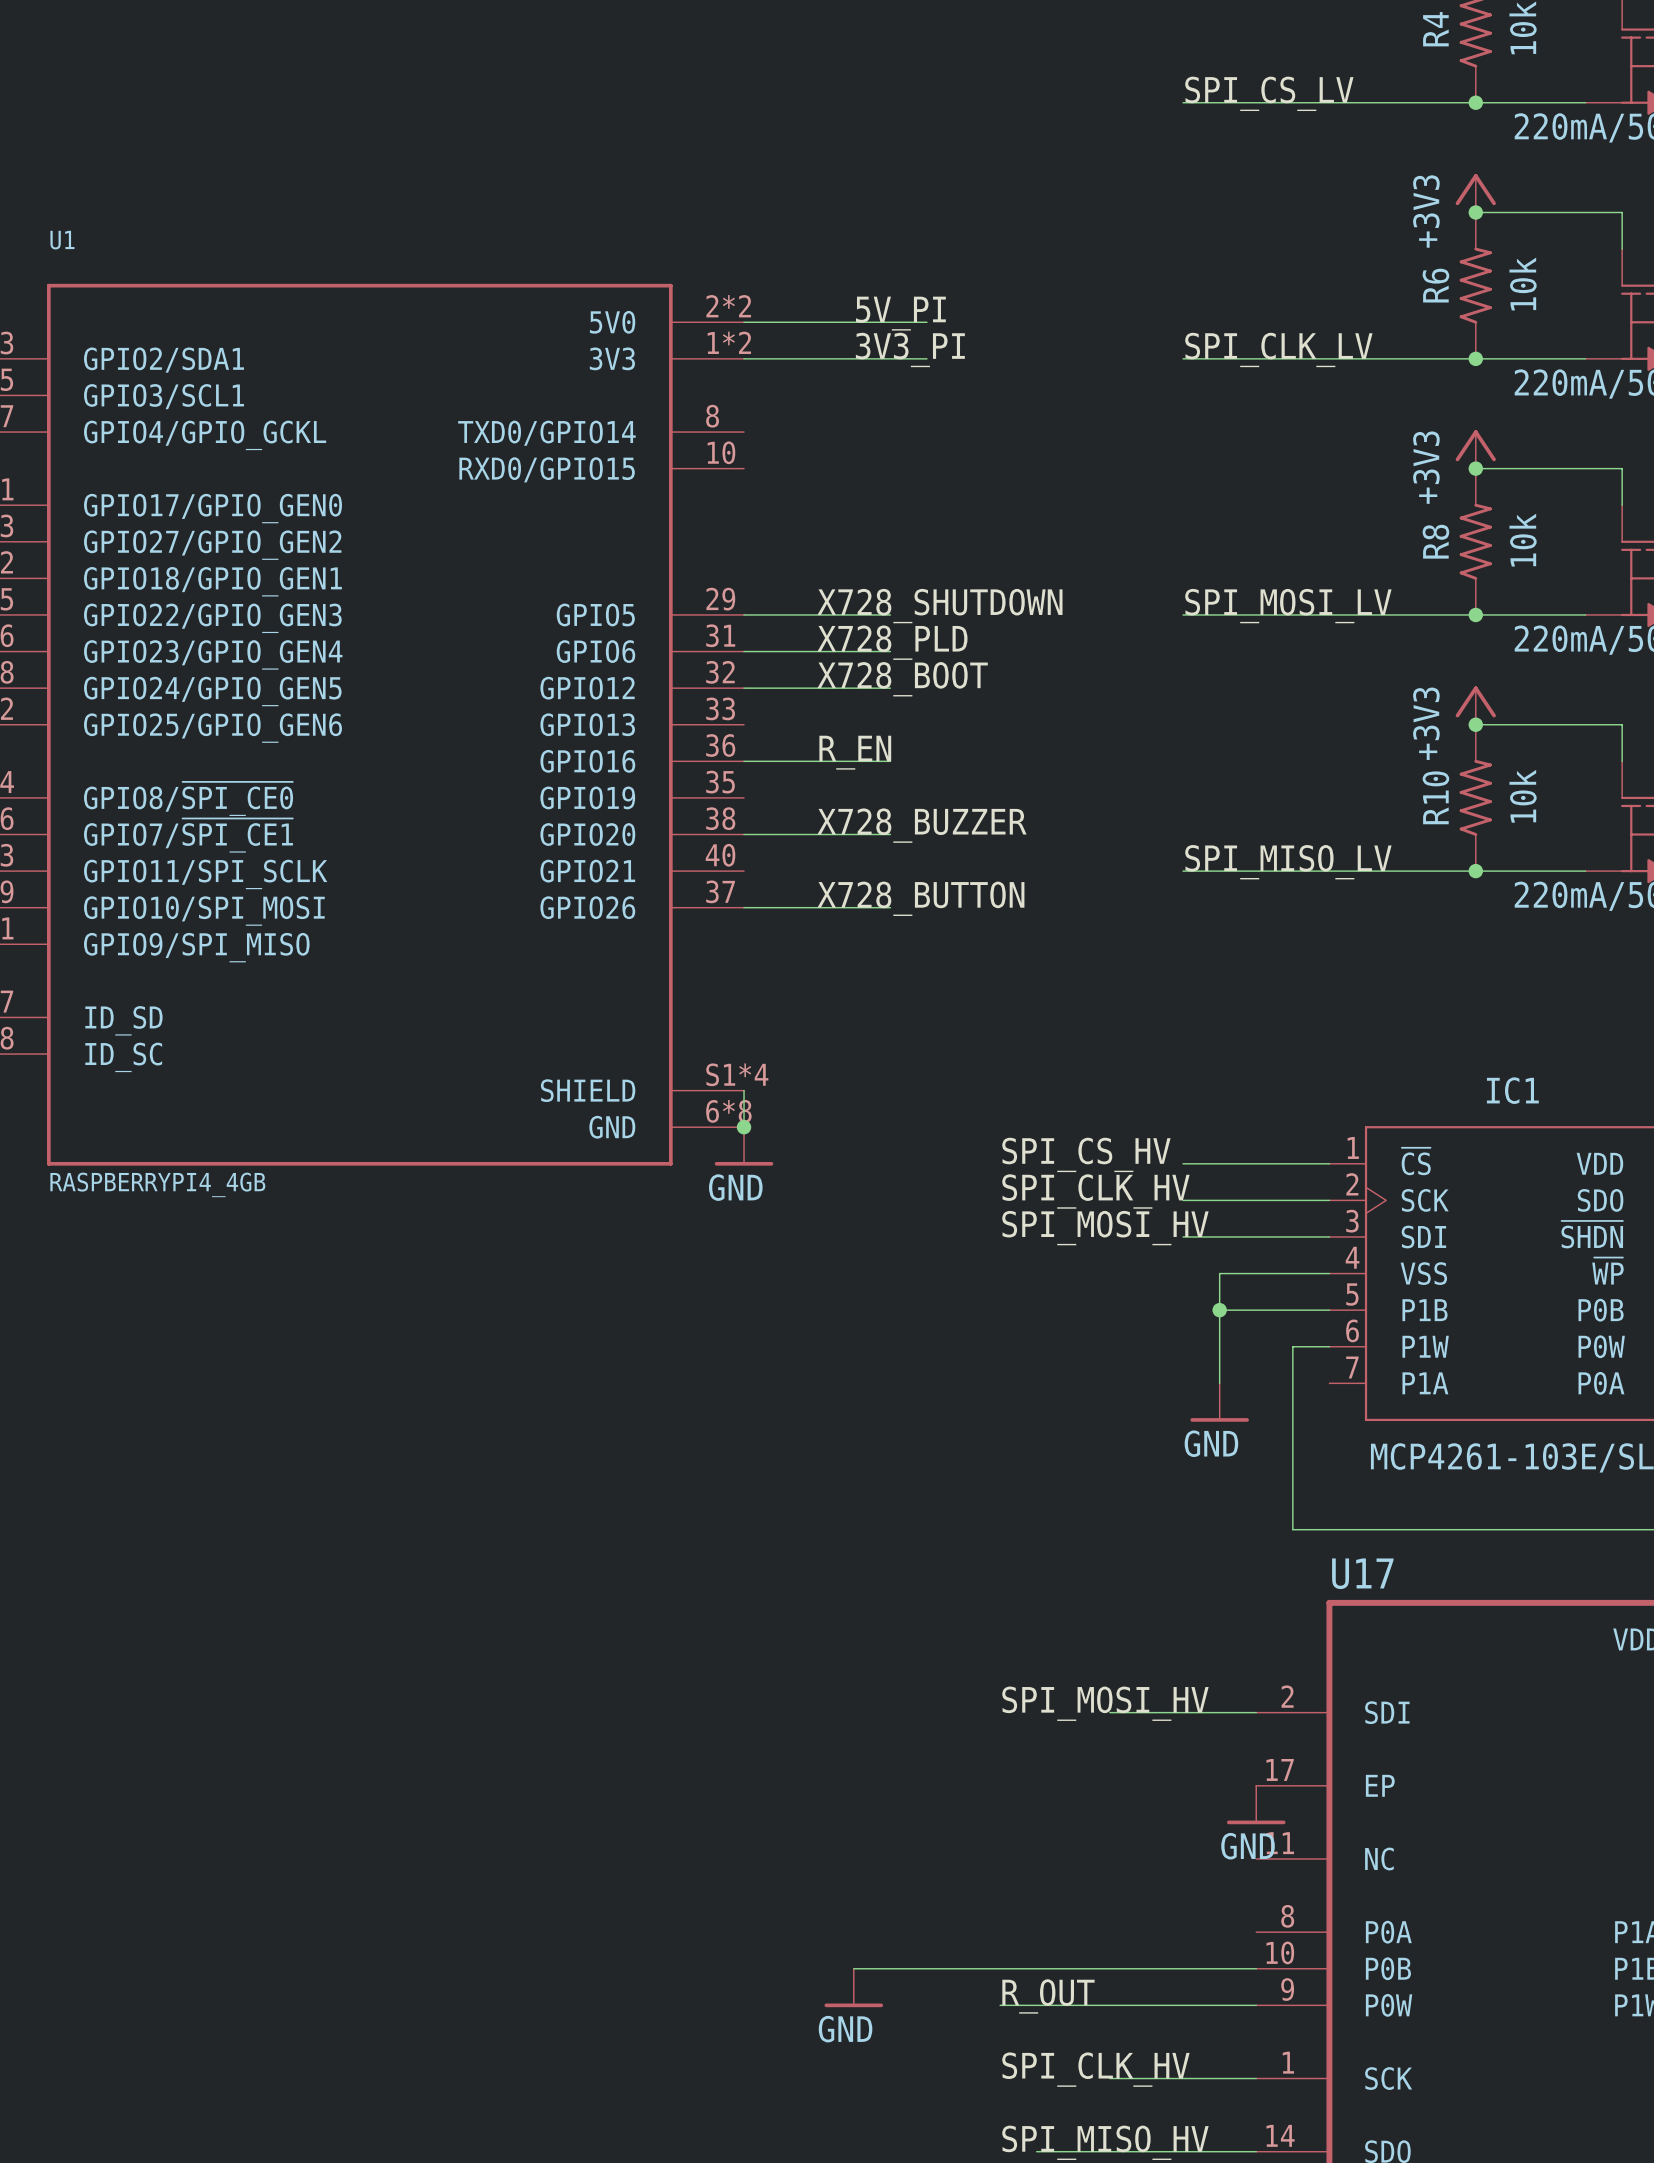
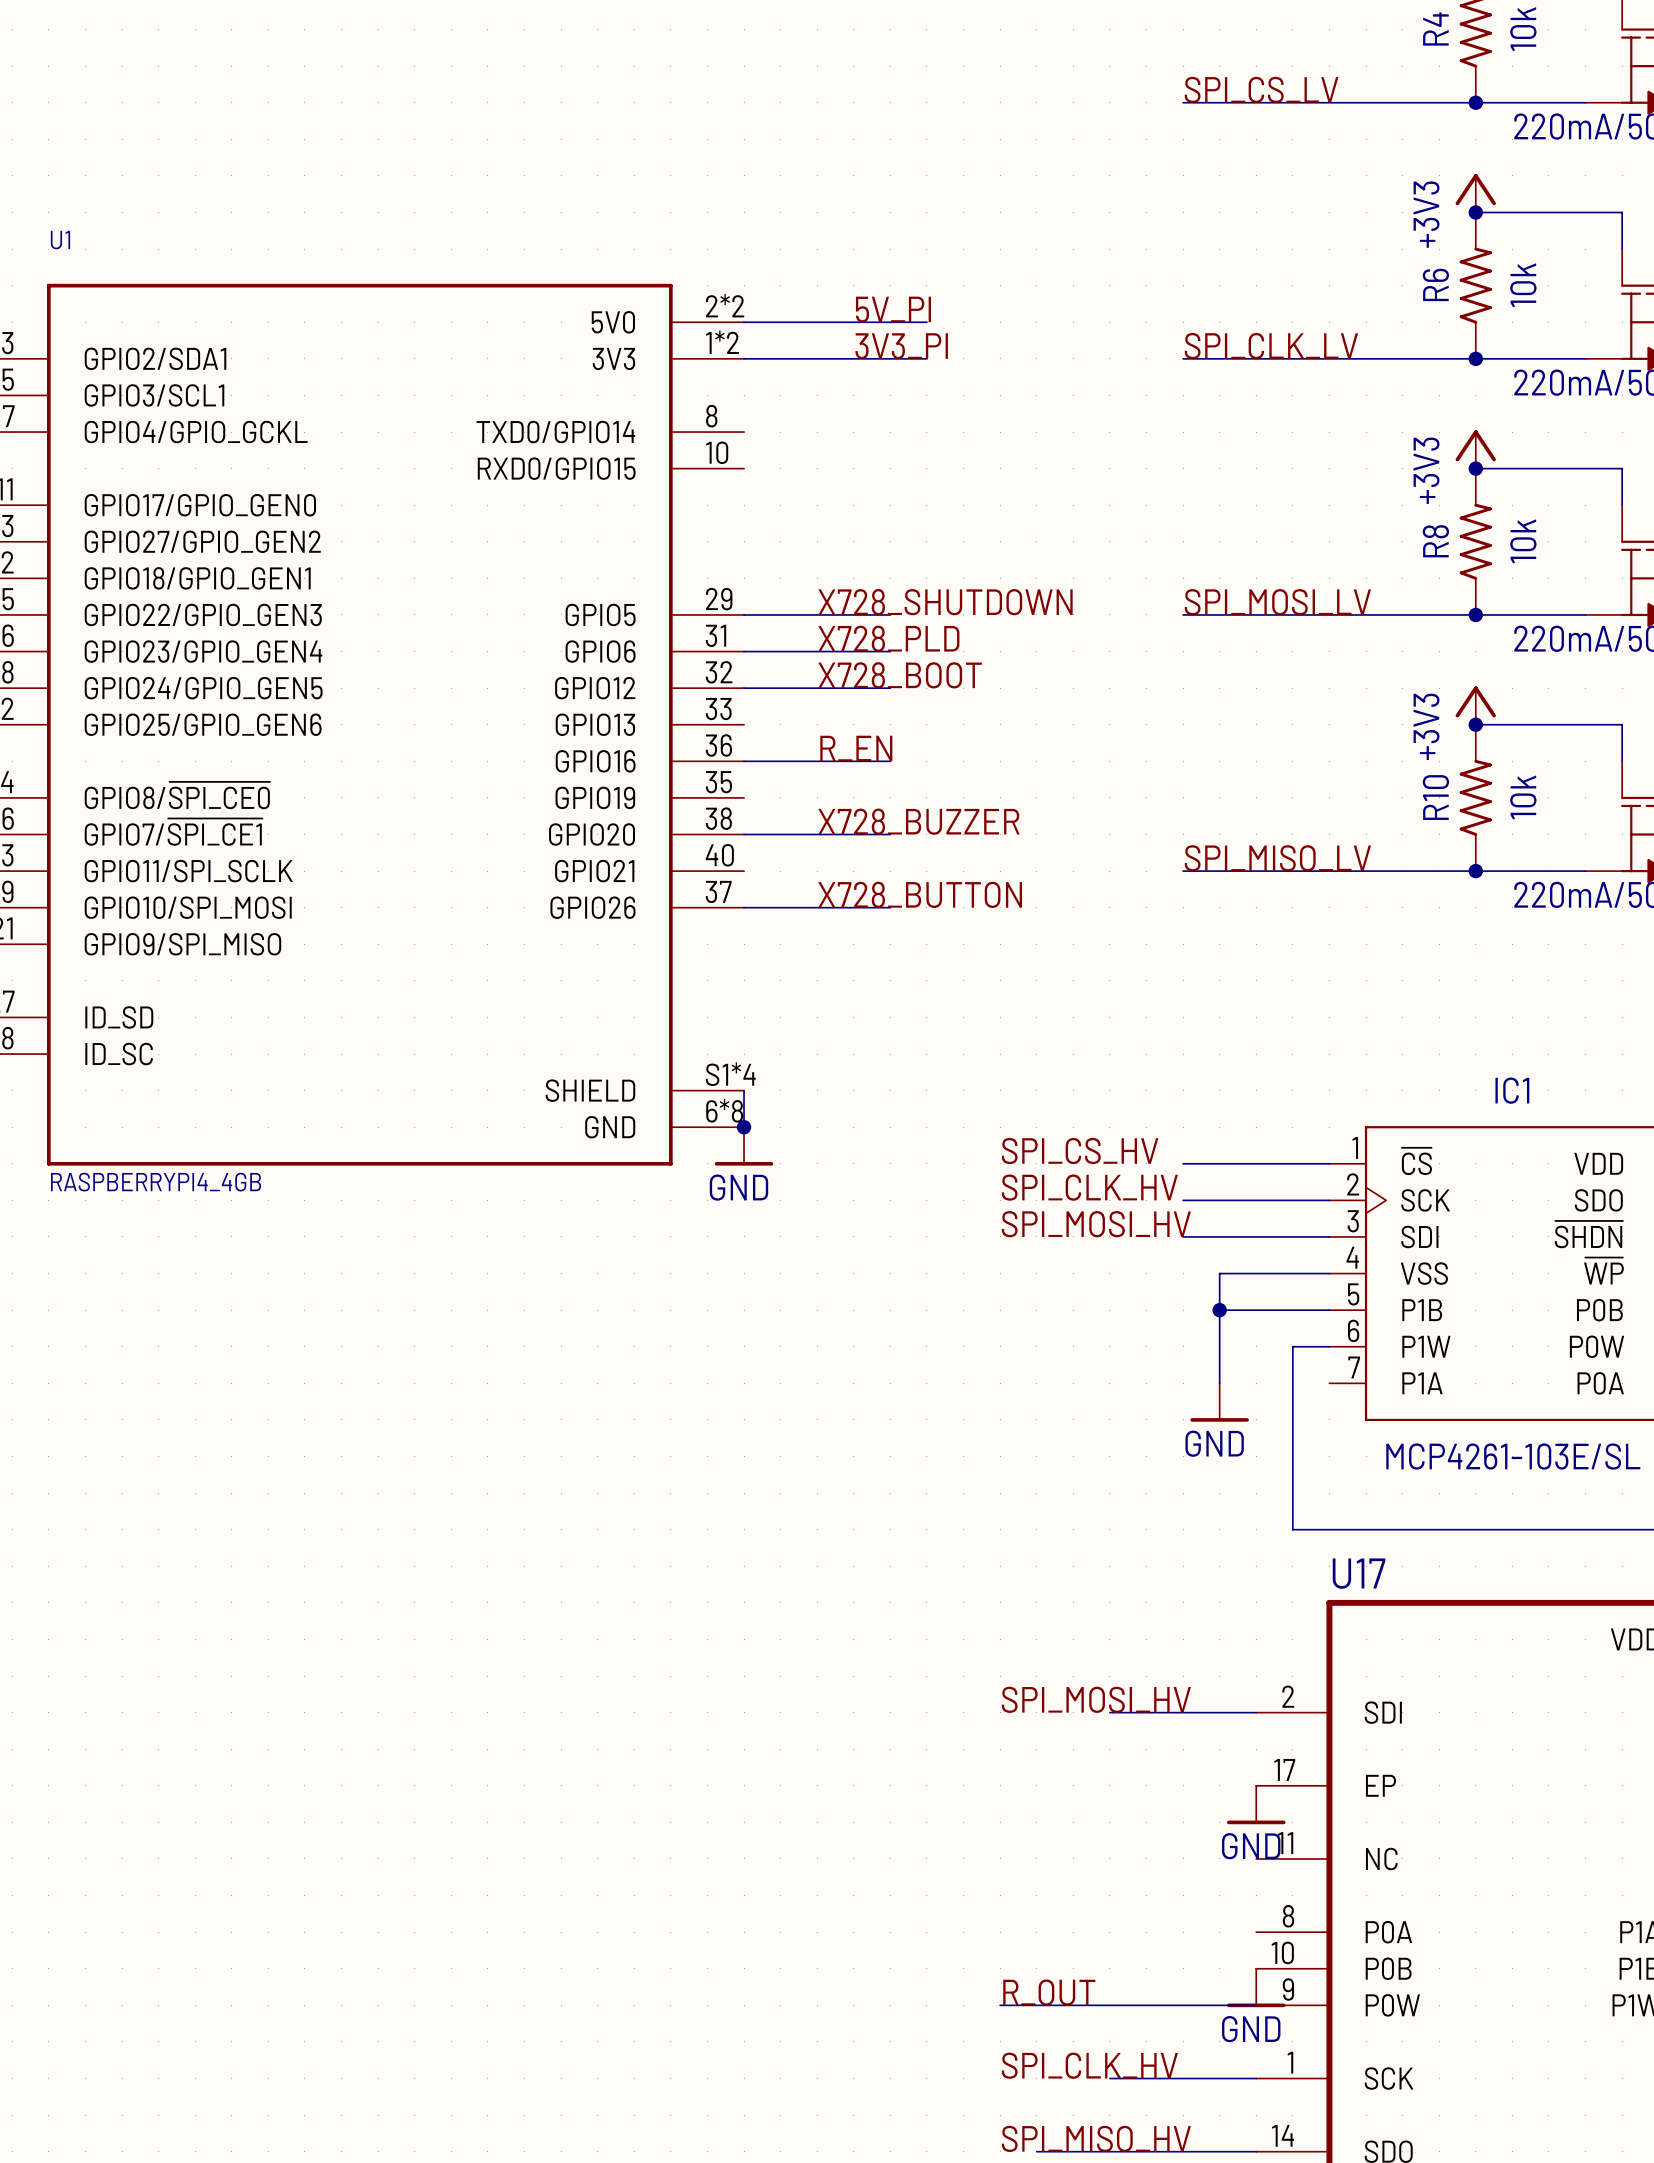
wire: (853, 1968) (1256, 1968) -> none
power symbol: GND (853, 1987) -> none
power symbol: none -> GND (1256, 1987)

